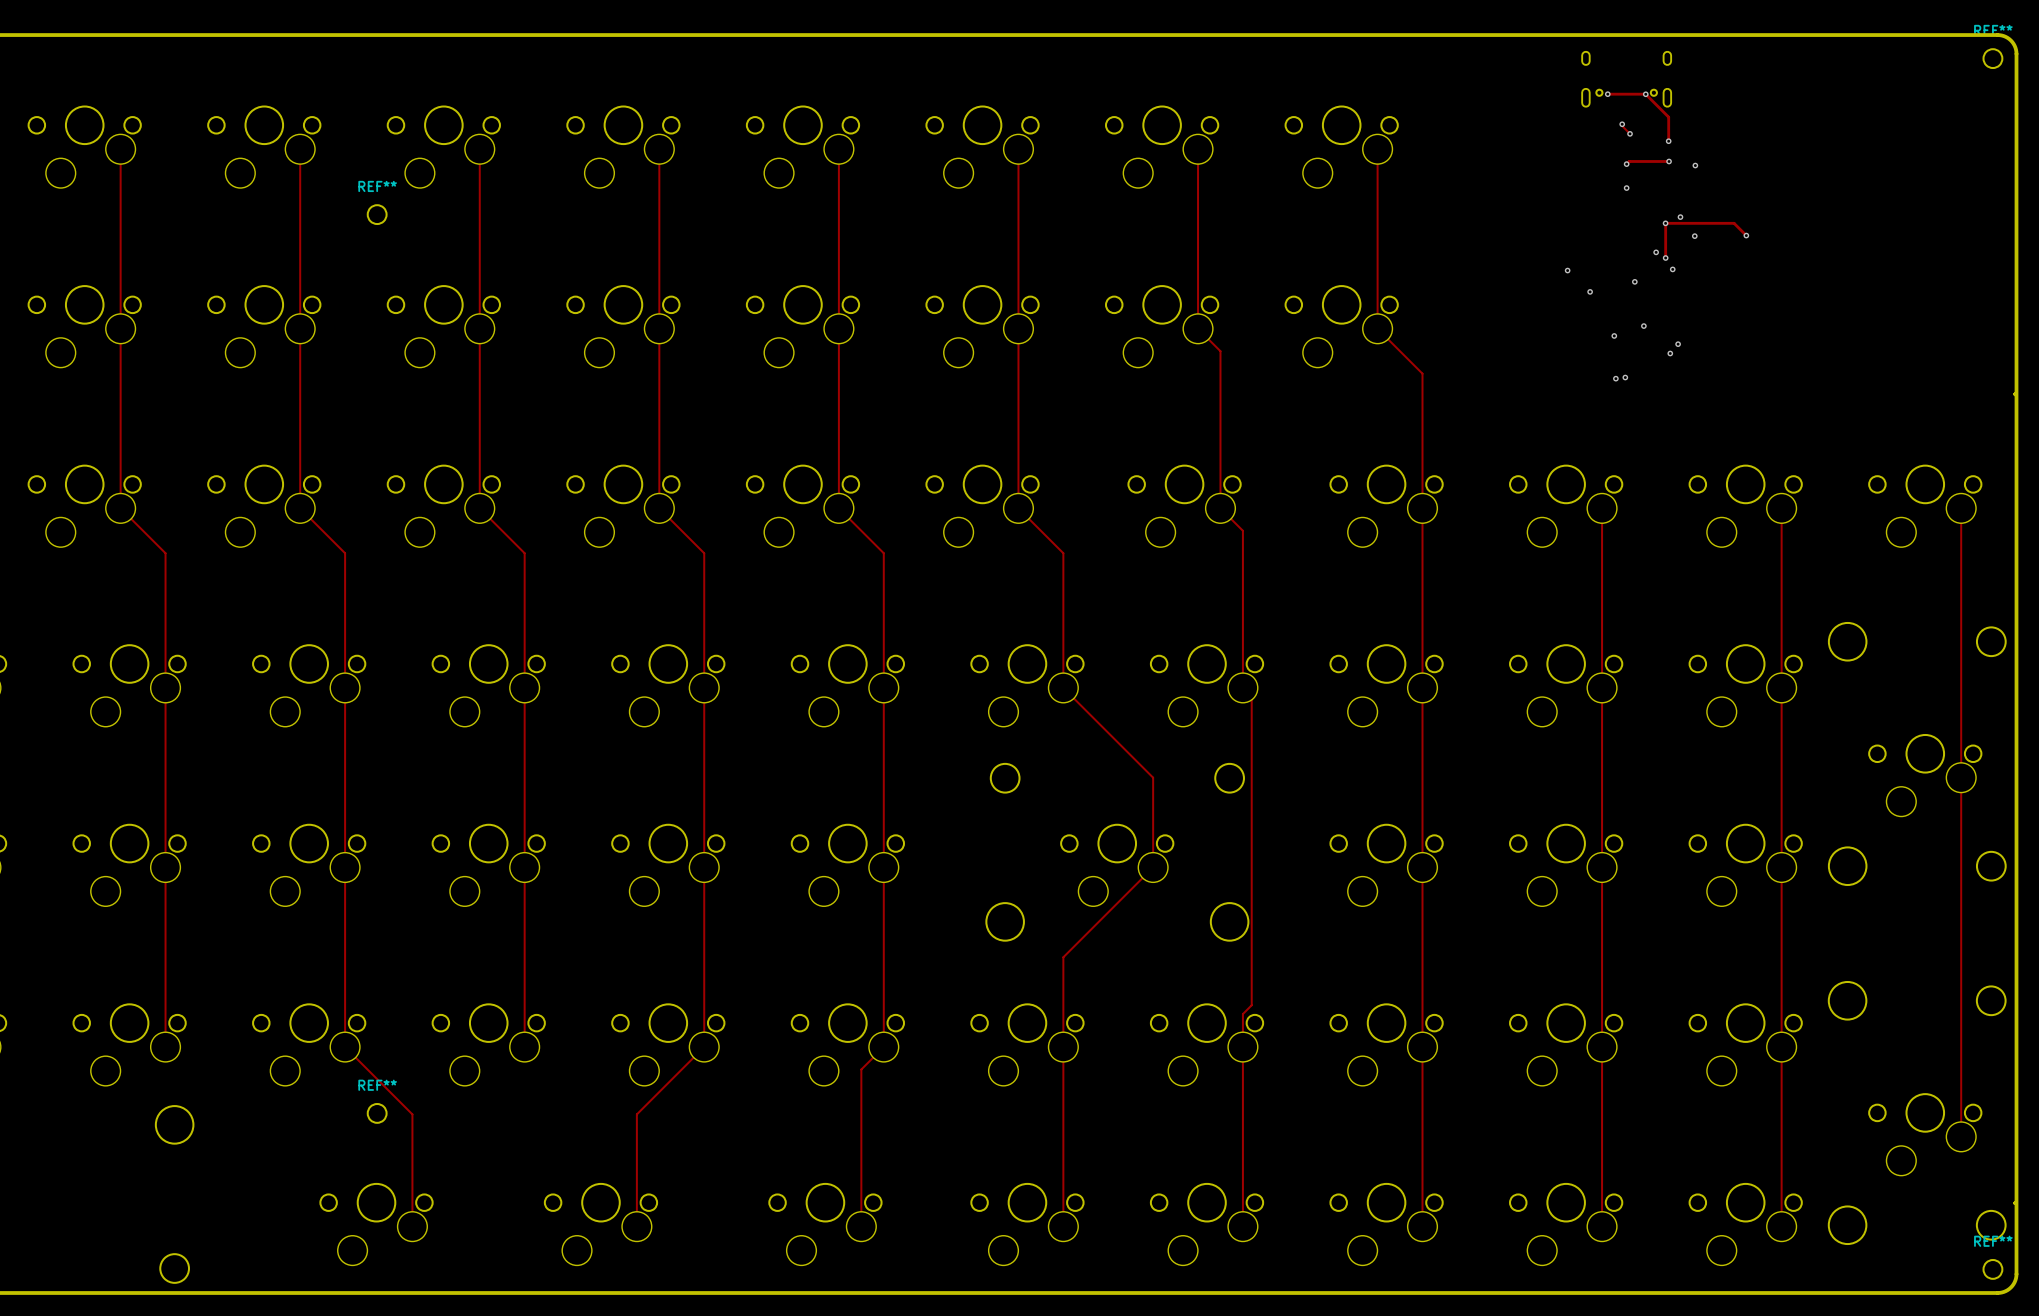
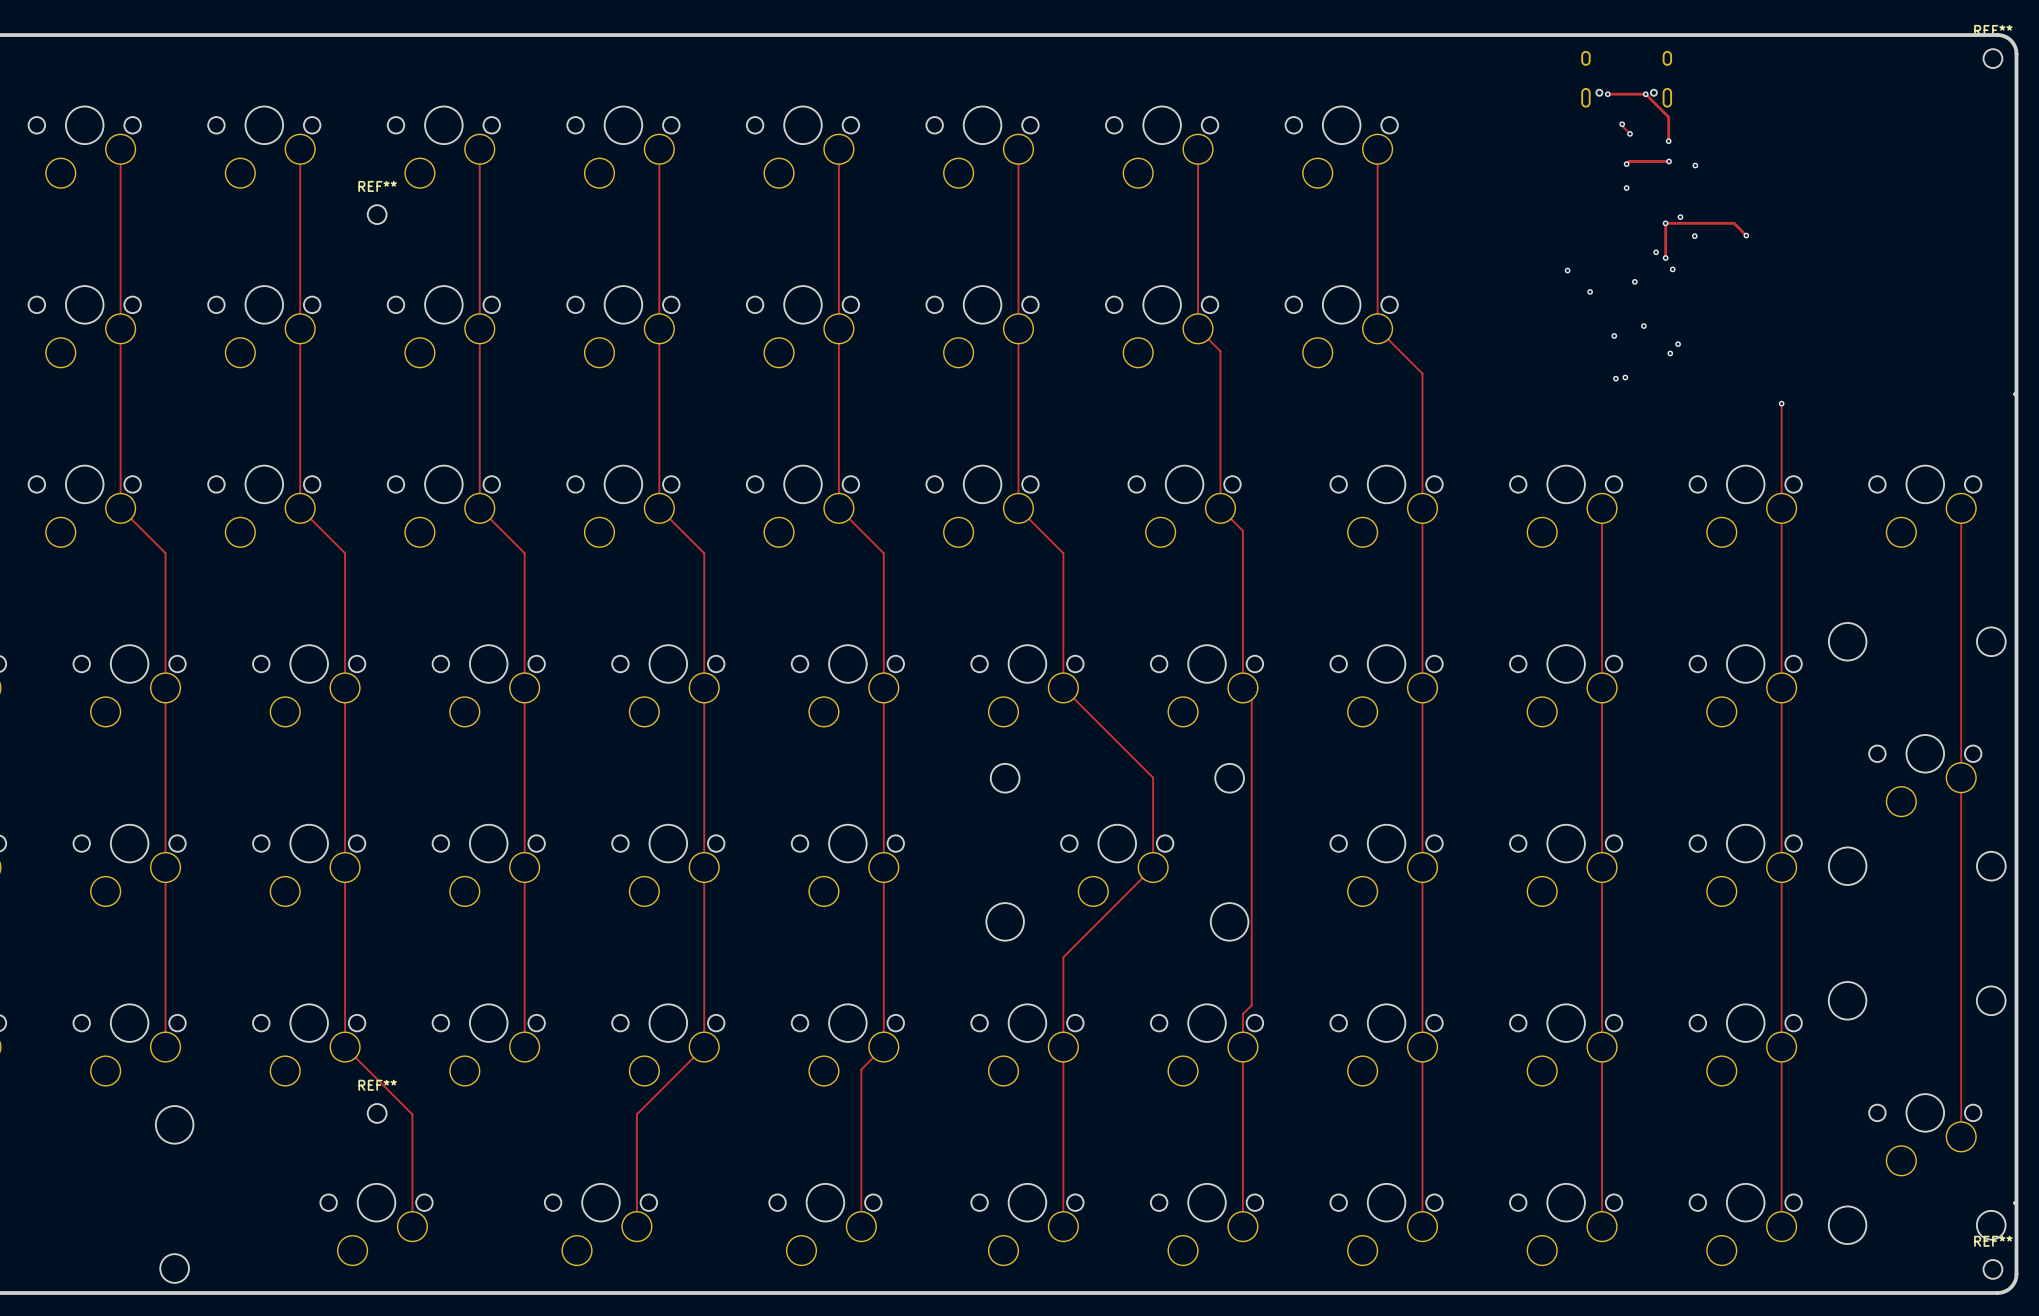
track: none -> (1781, 403) (1781, 508)
via: none -> (1781, 403)

